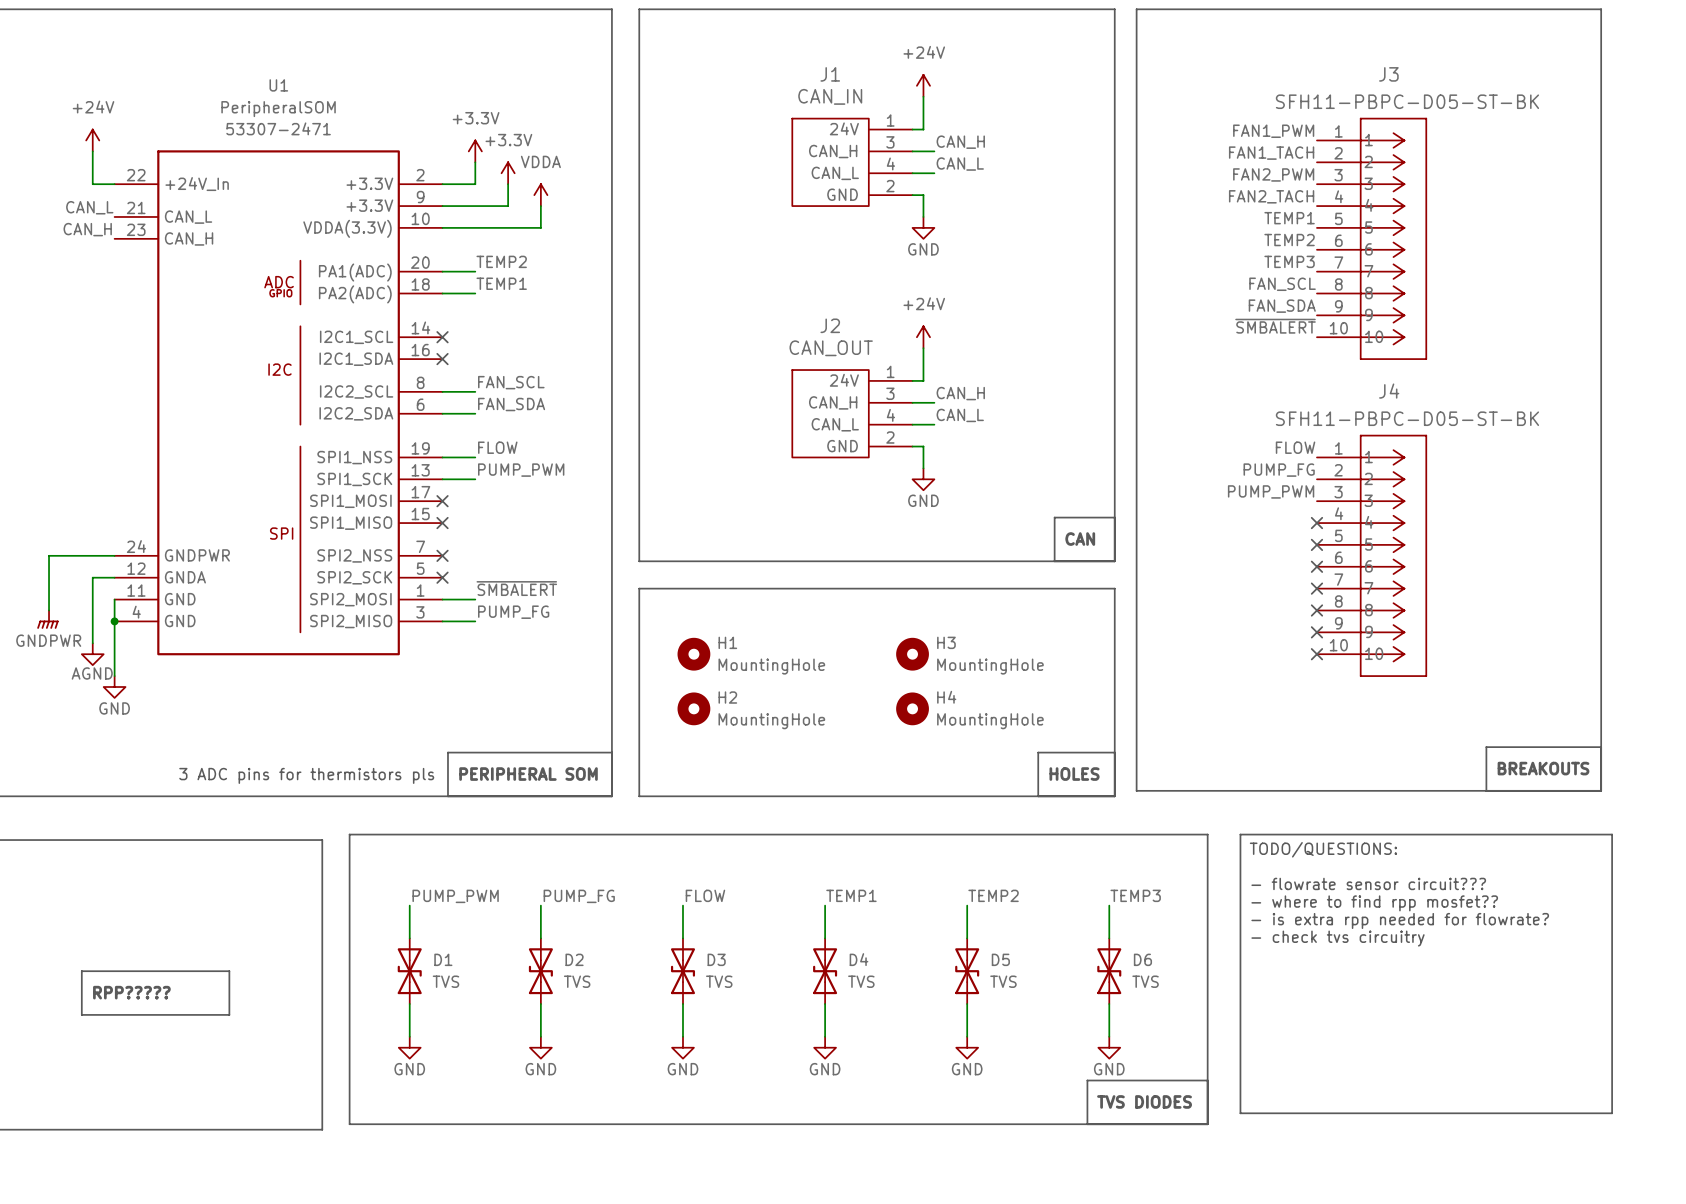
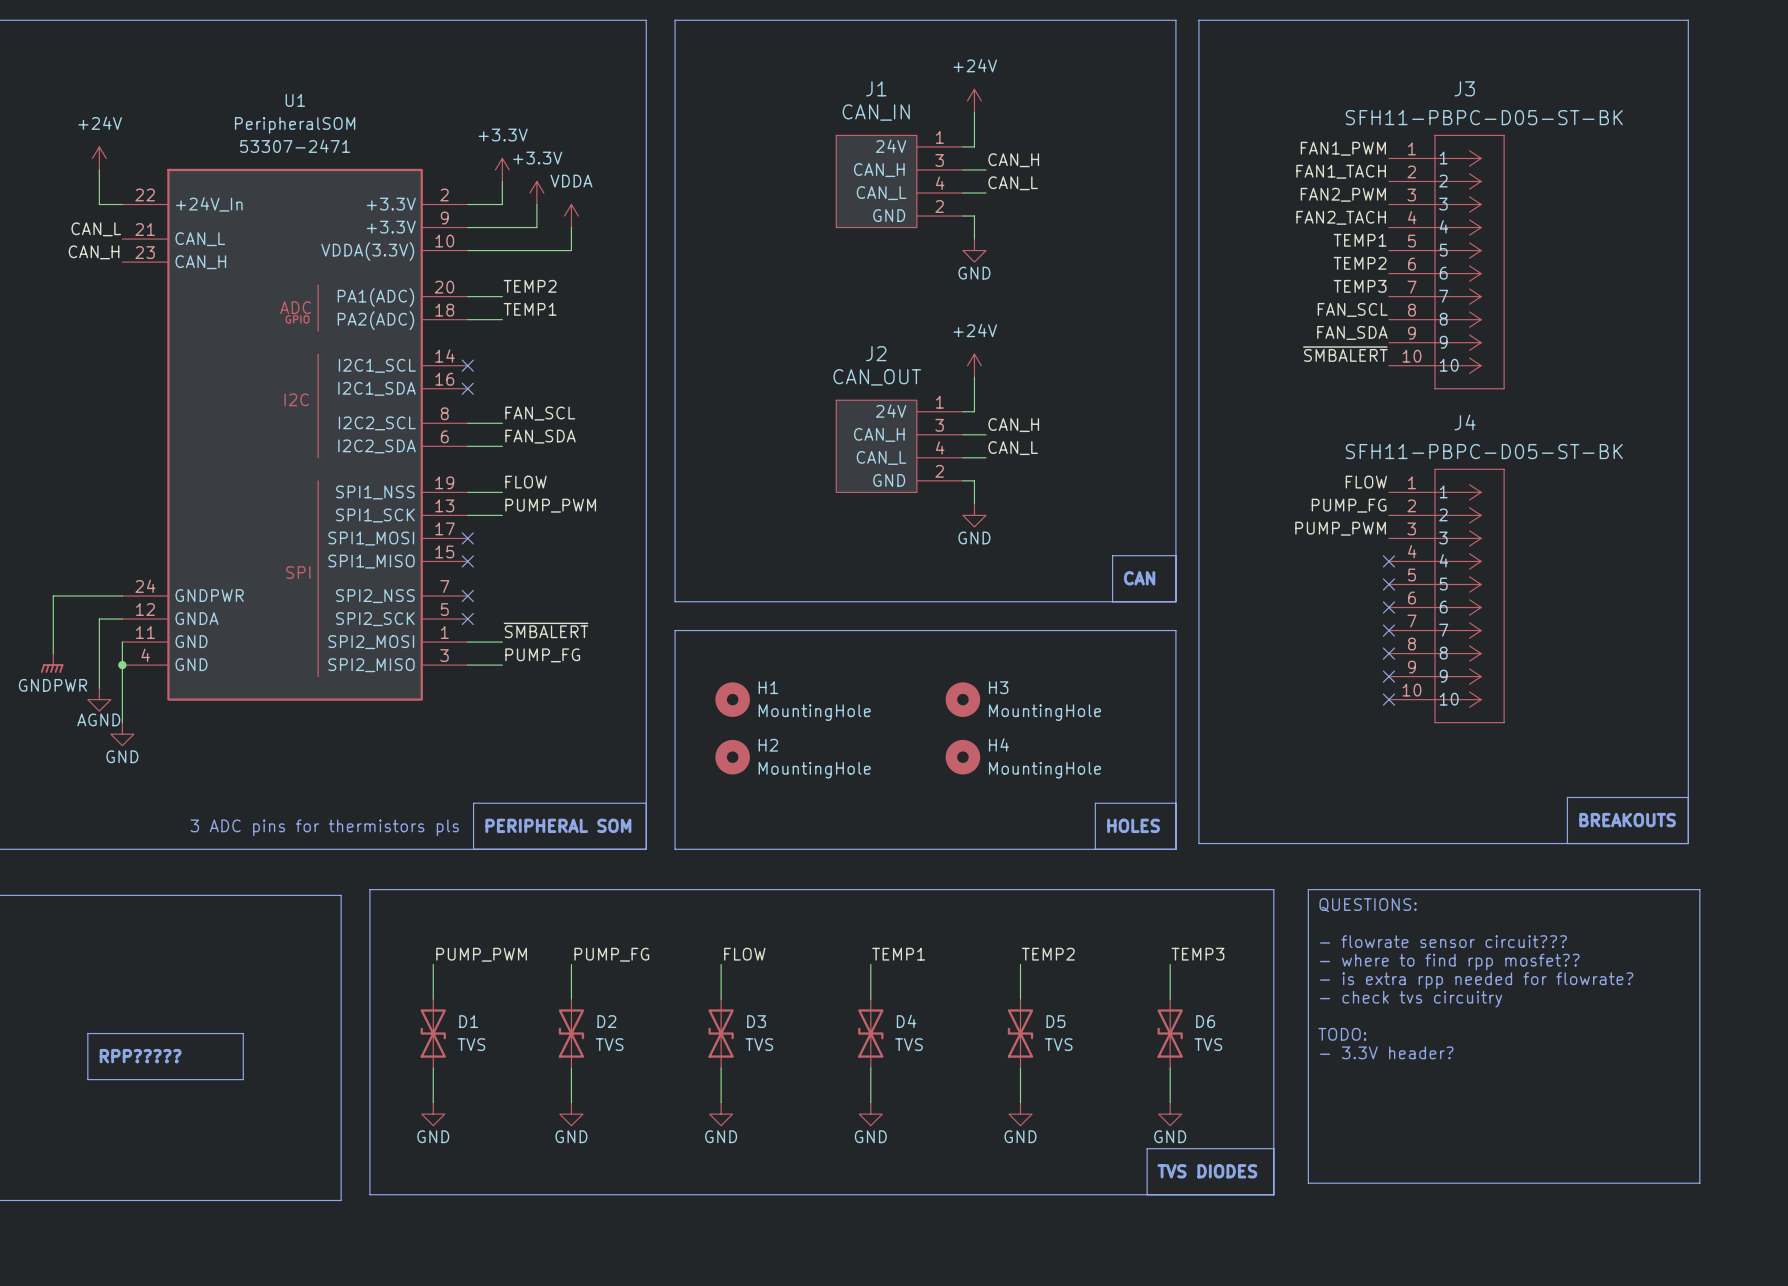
text: TODO/QUESTIONS: (1323, 849) -> QUESTIONS: (1368, 905)
text: none -> TODO: (1342, 1034)
text: none -> - 3.3V header? (1386, 1052)

